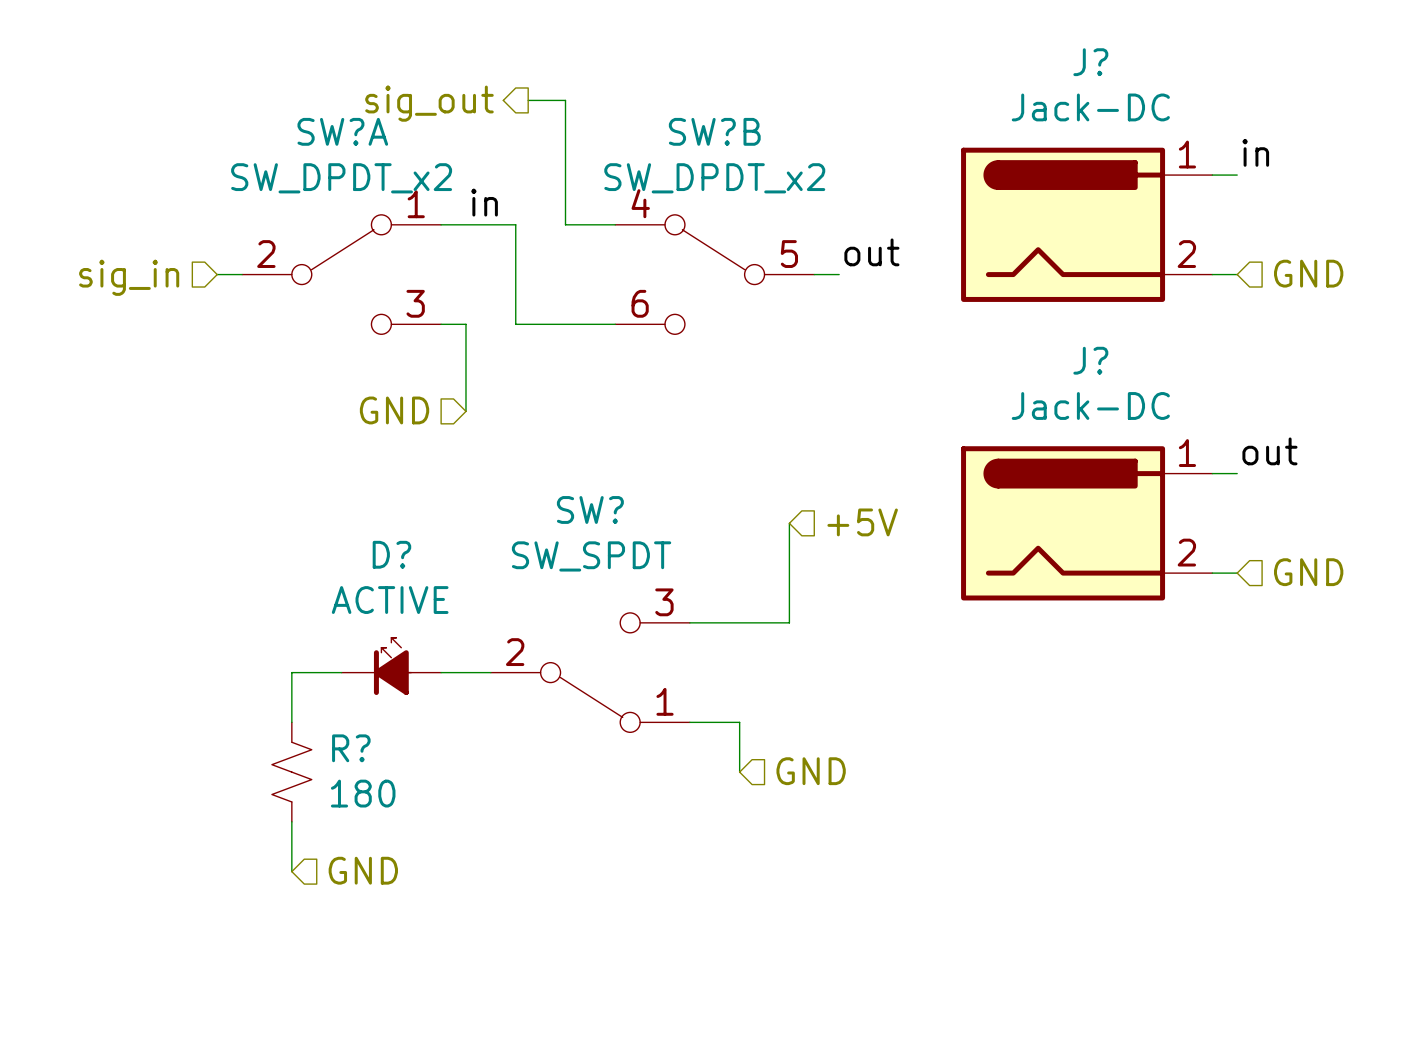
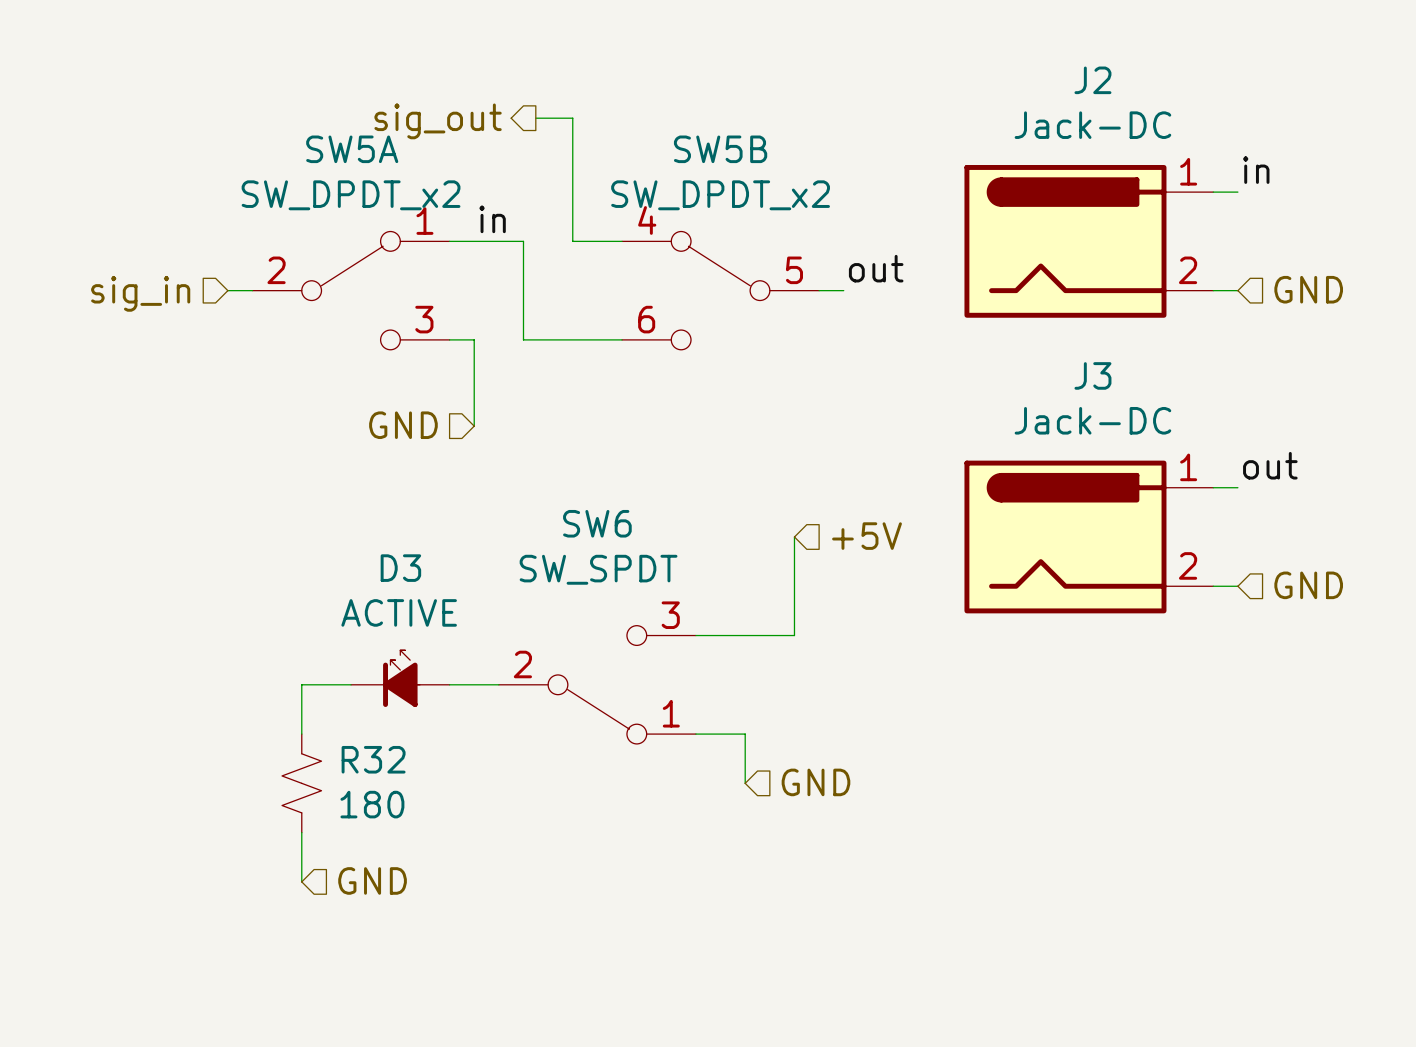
SW?A name: SW?A (342, 131) -> SW5A (352, 149)
SW?B name: SW?B (714, 131) -> SW5B (720, 149)
J?: Jack-DC (1086, 224) -> none
J2: none -> Jack-DC (1088, 241)
SW? name: SW? (590, 509) -> SW6 (597, 523)
J?: Jack-DC (1086, 523) -> none
J3: none -> Jack-DC (1088, 536)
D? name: D? (391, 554) -> D3 (400, 568)
R? name: R? (351, 748) -> R32 (373, 759)

